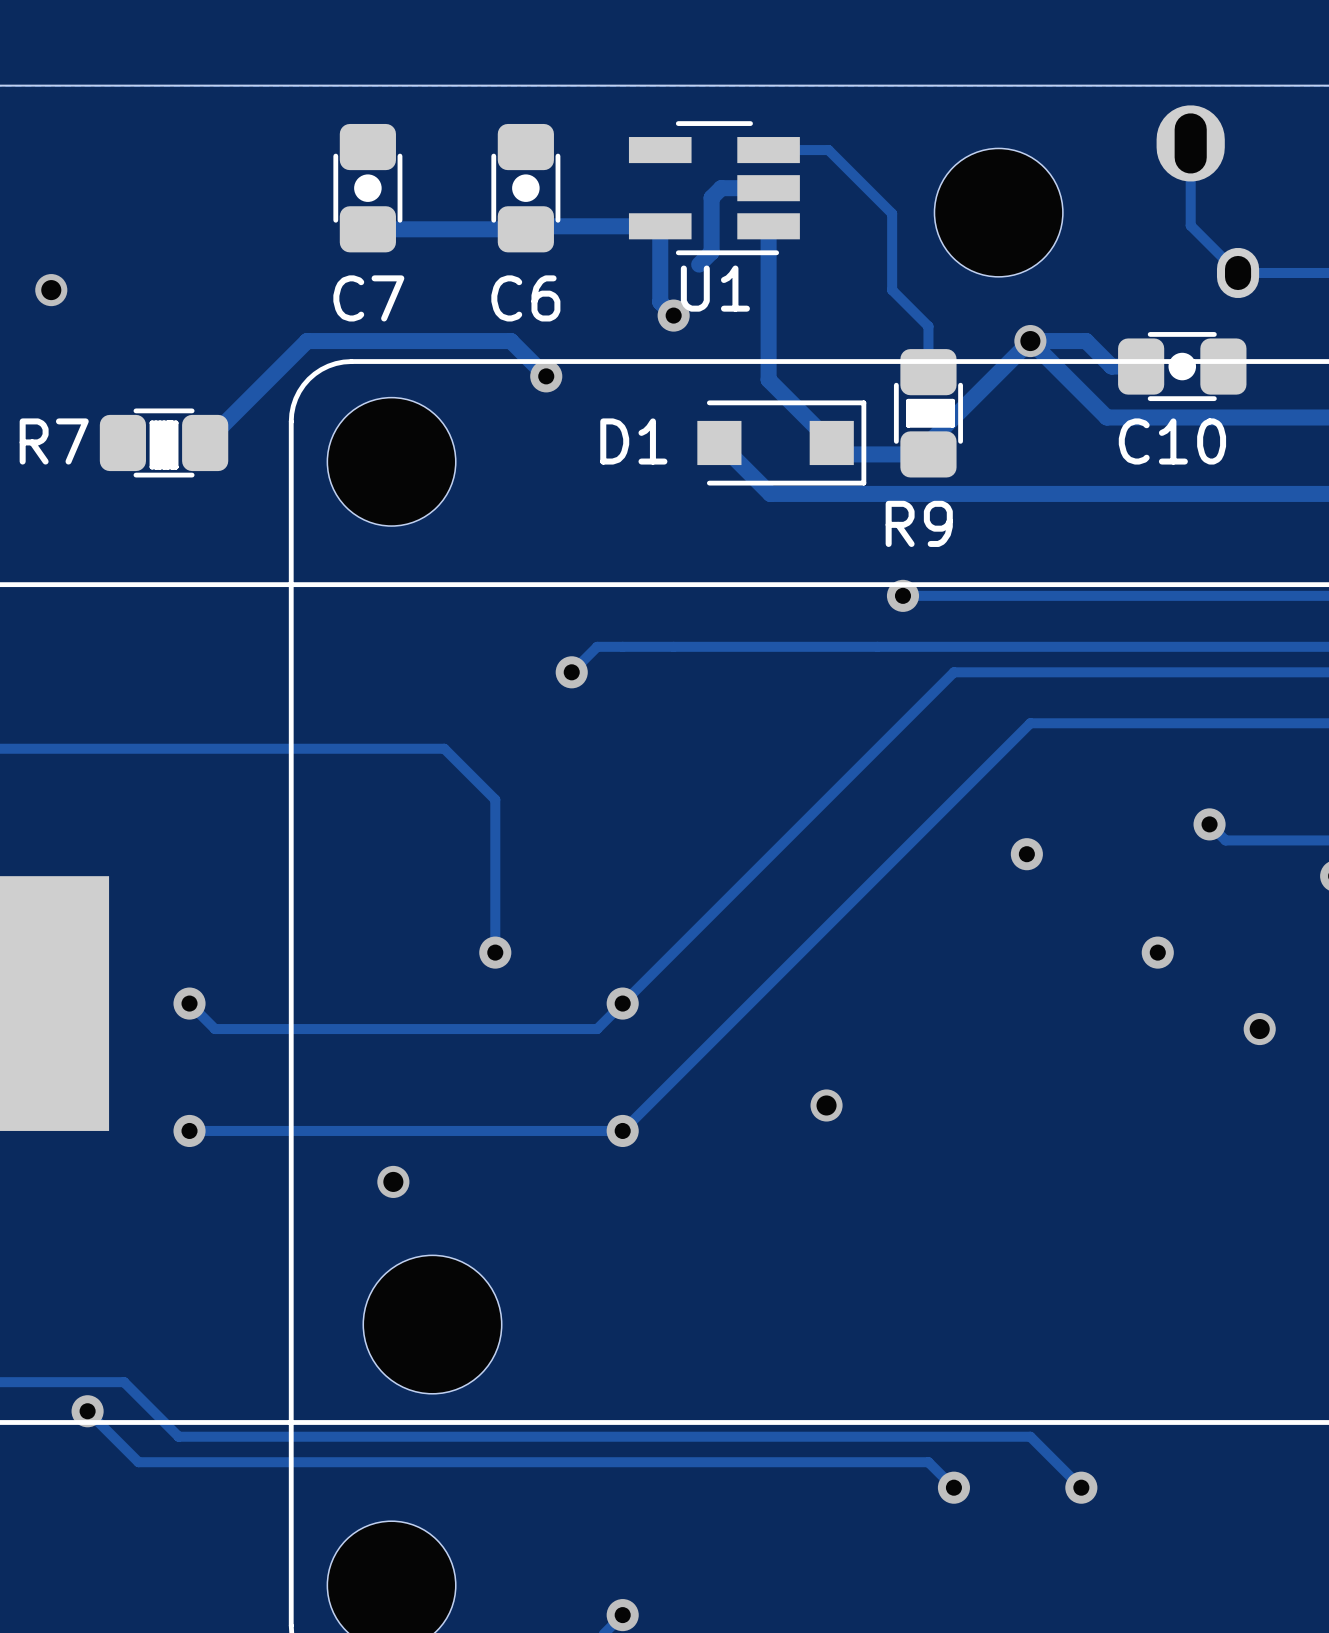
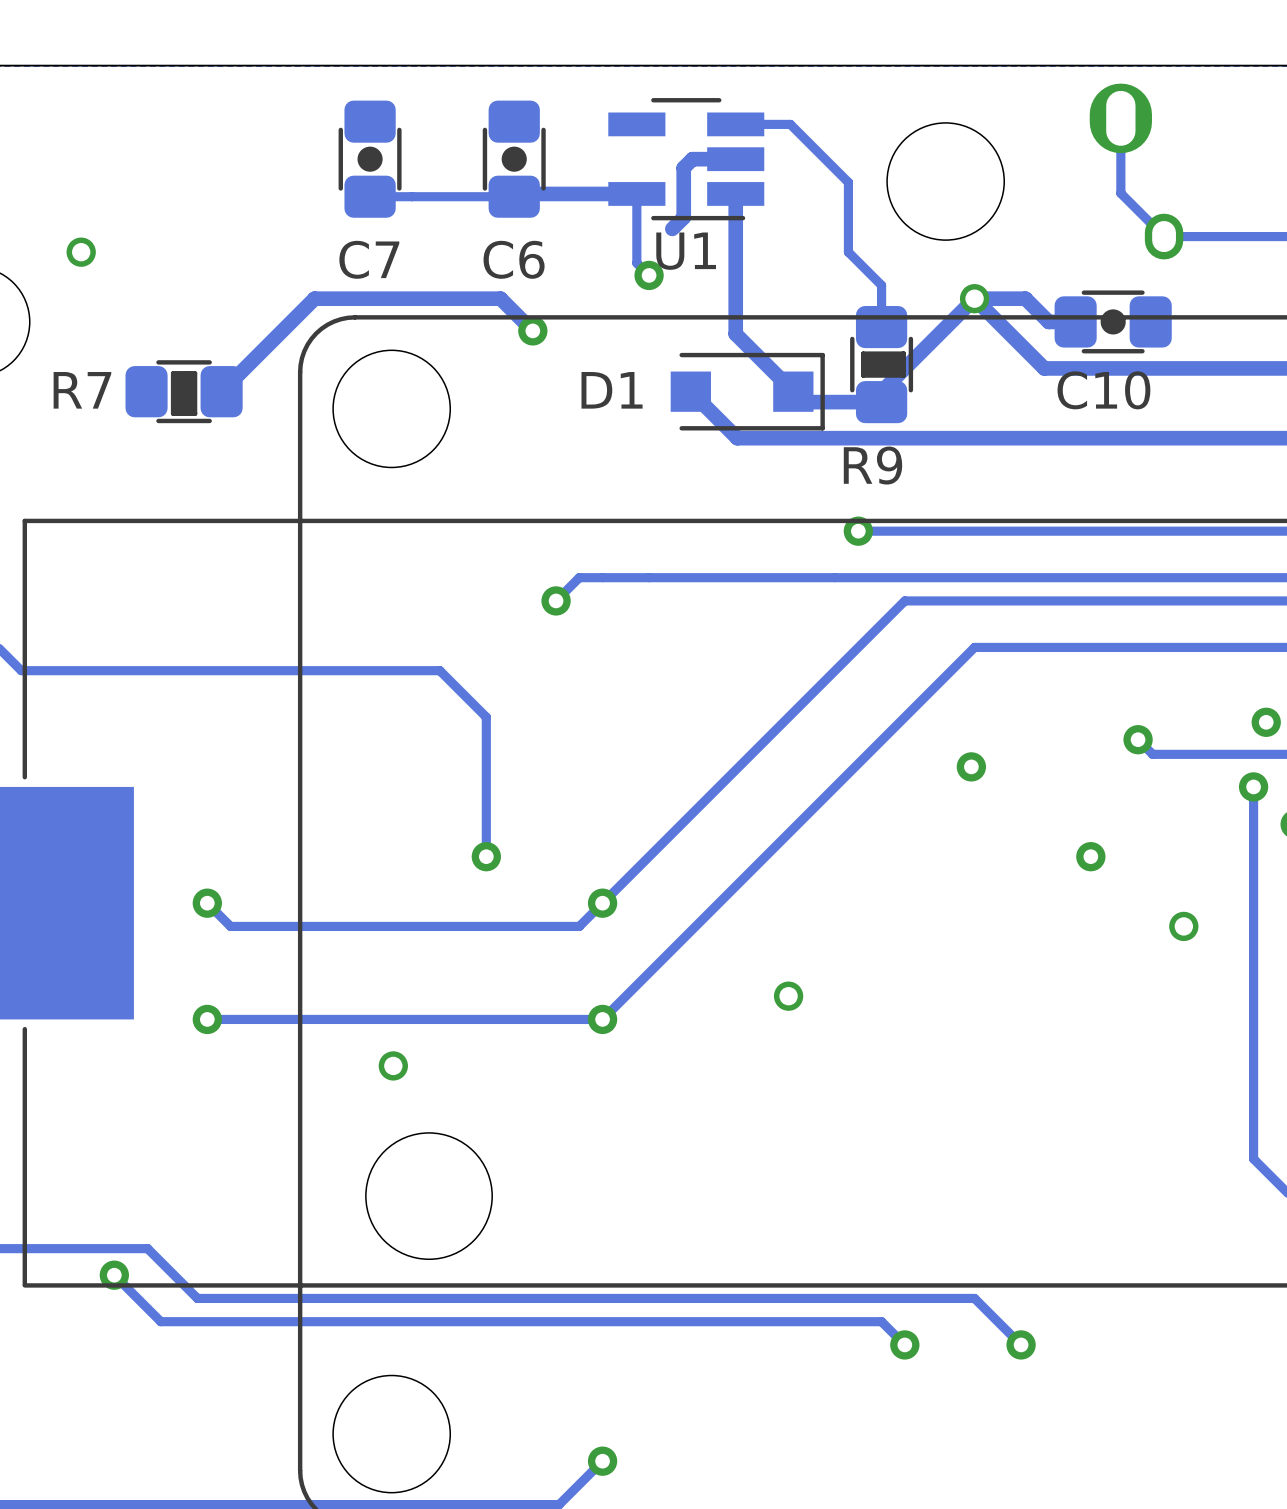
track width: thick (660, 226) (660, 302) (673, 315) -> thin (636, 193) (636, 263) (649, 275)
track width: thick (525, 229) (367, 229) -> thin (514, 196) (370, 196)

